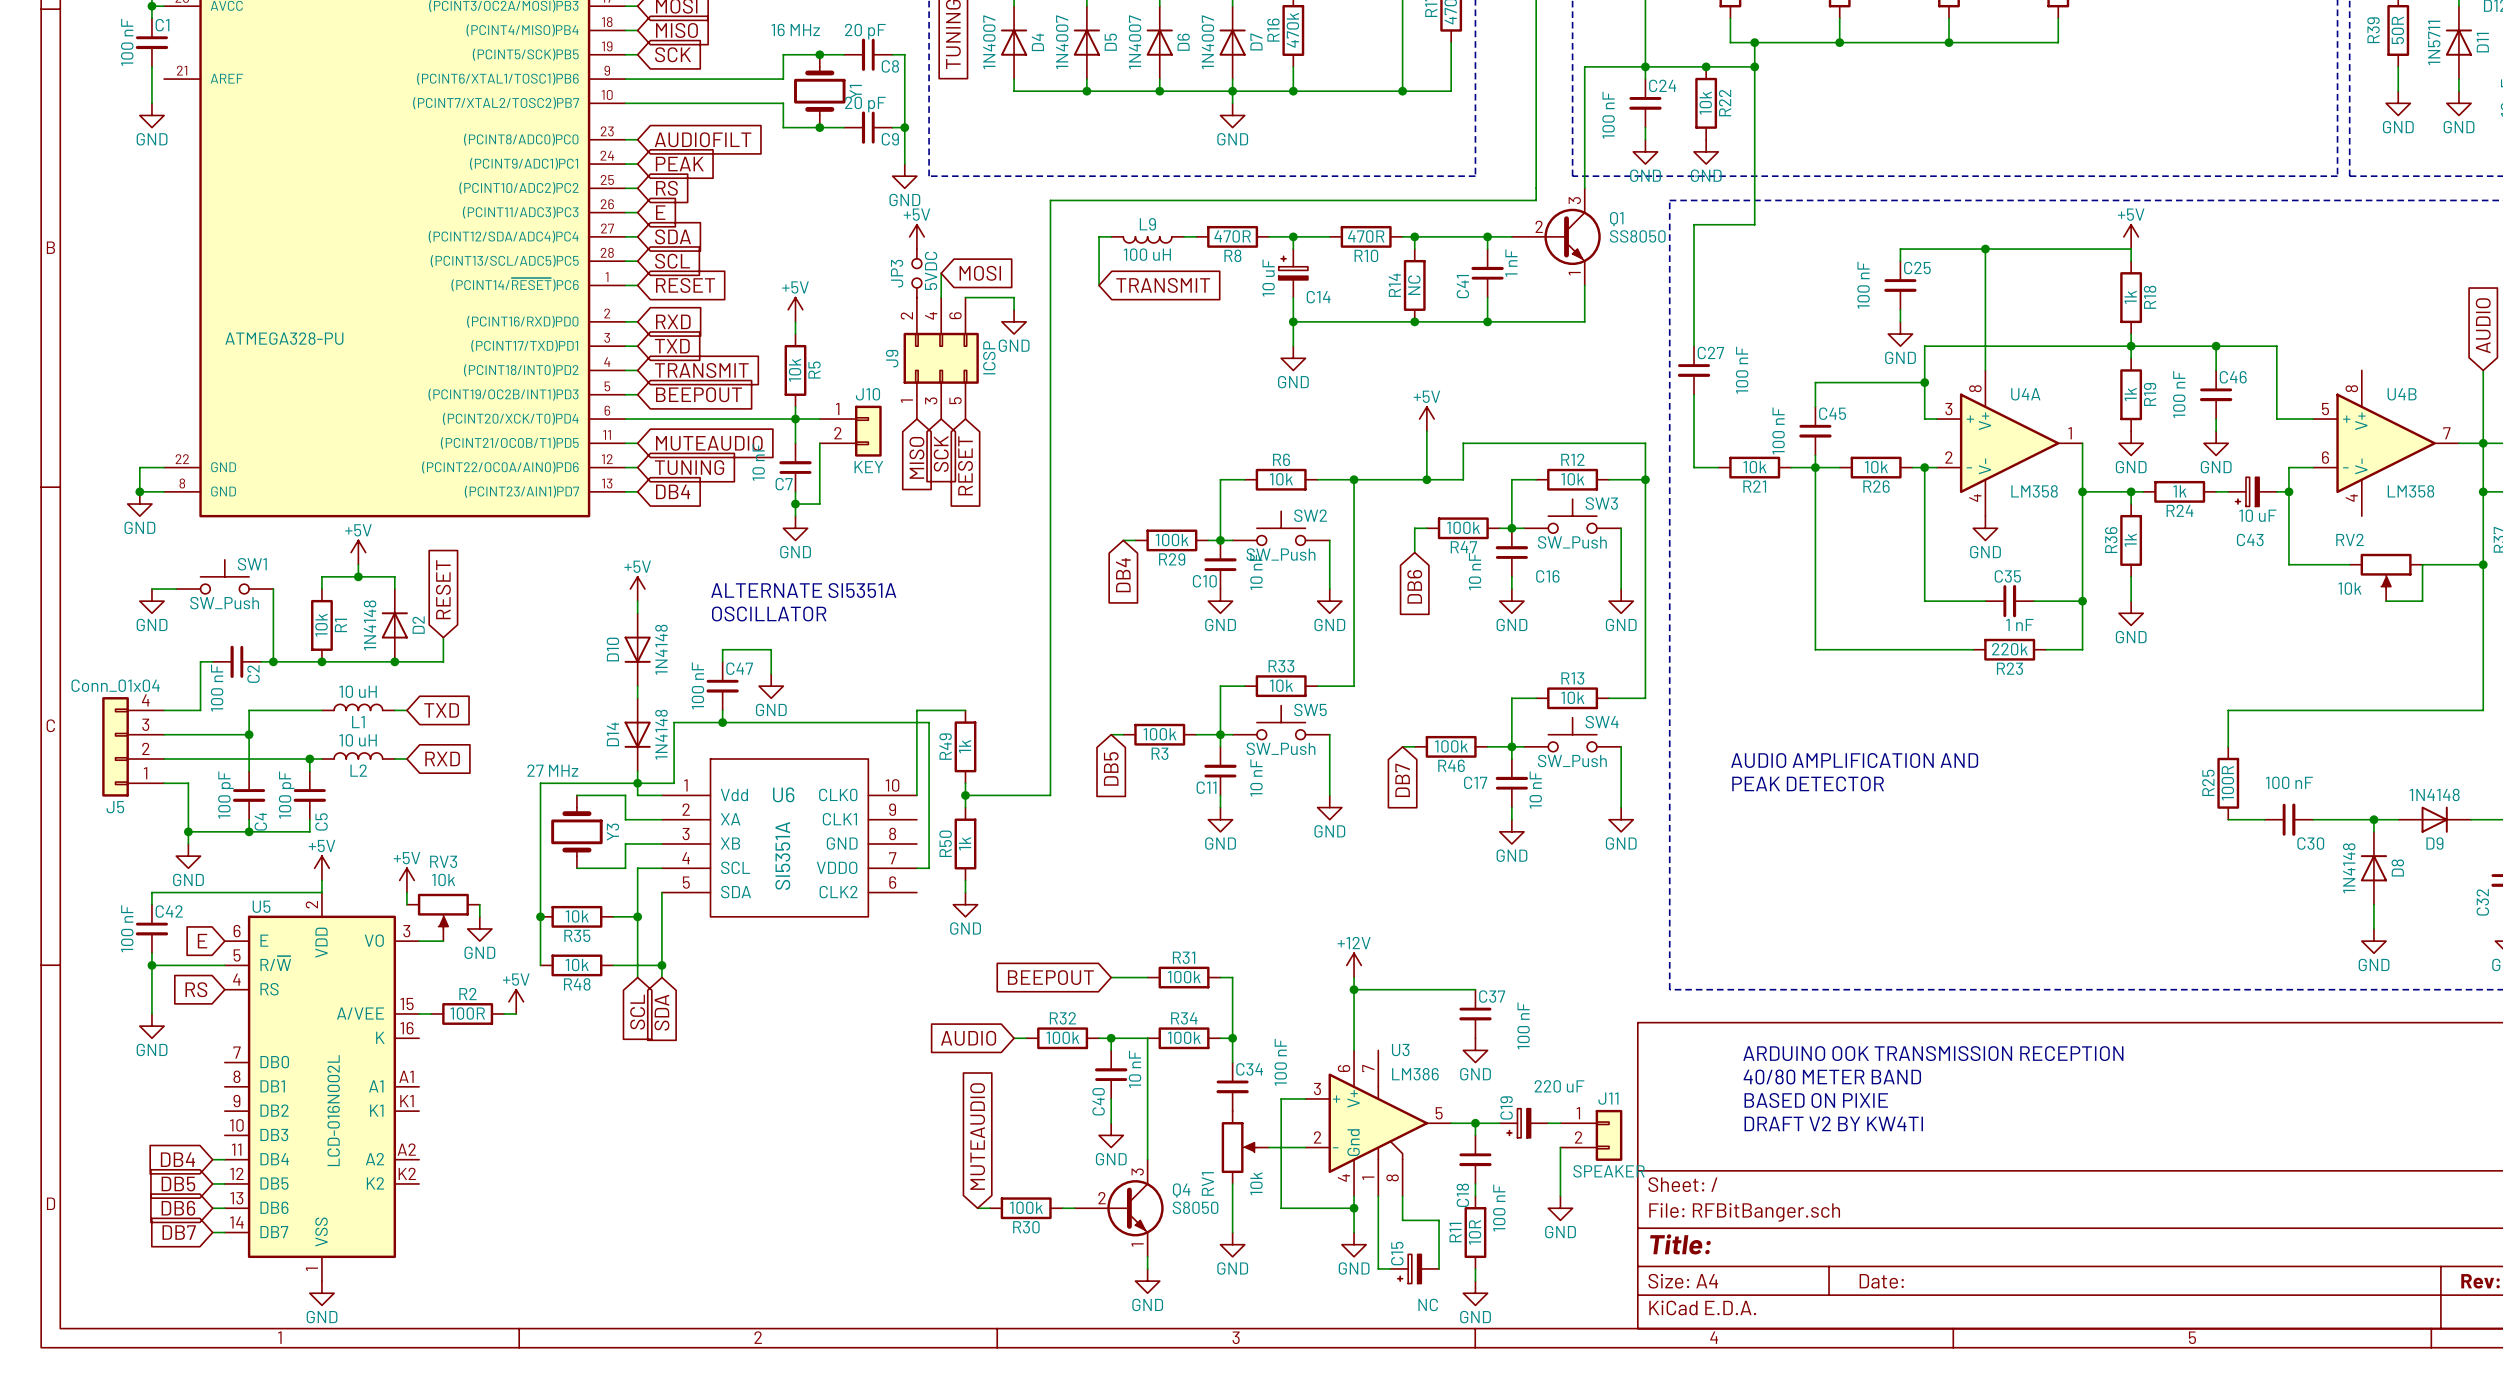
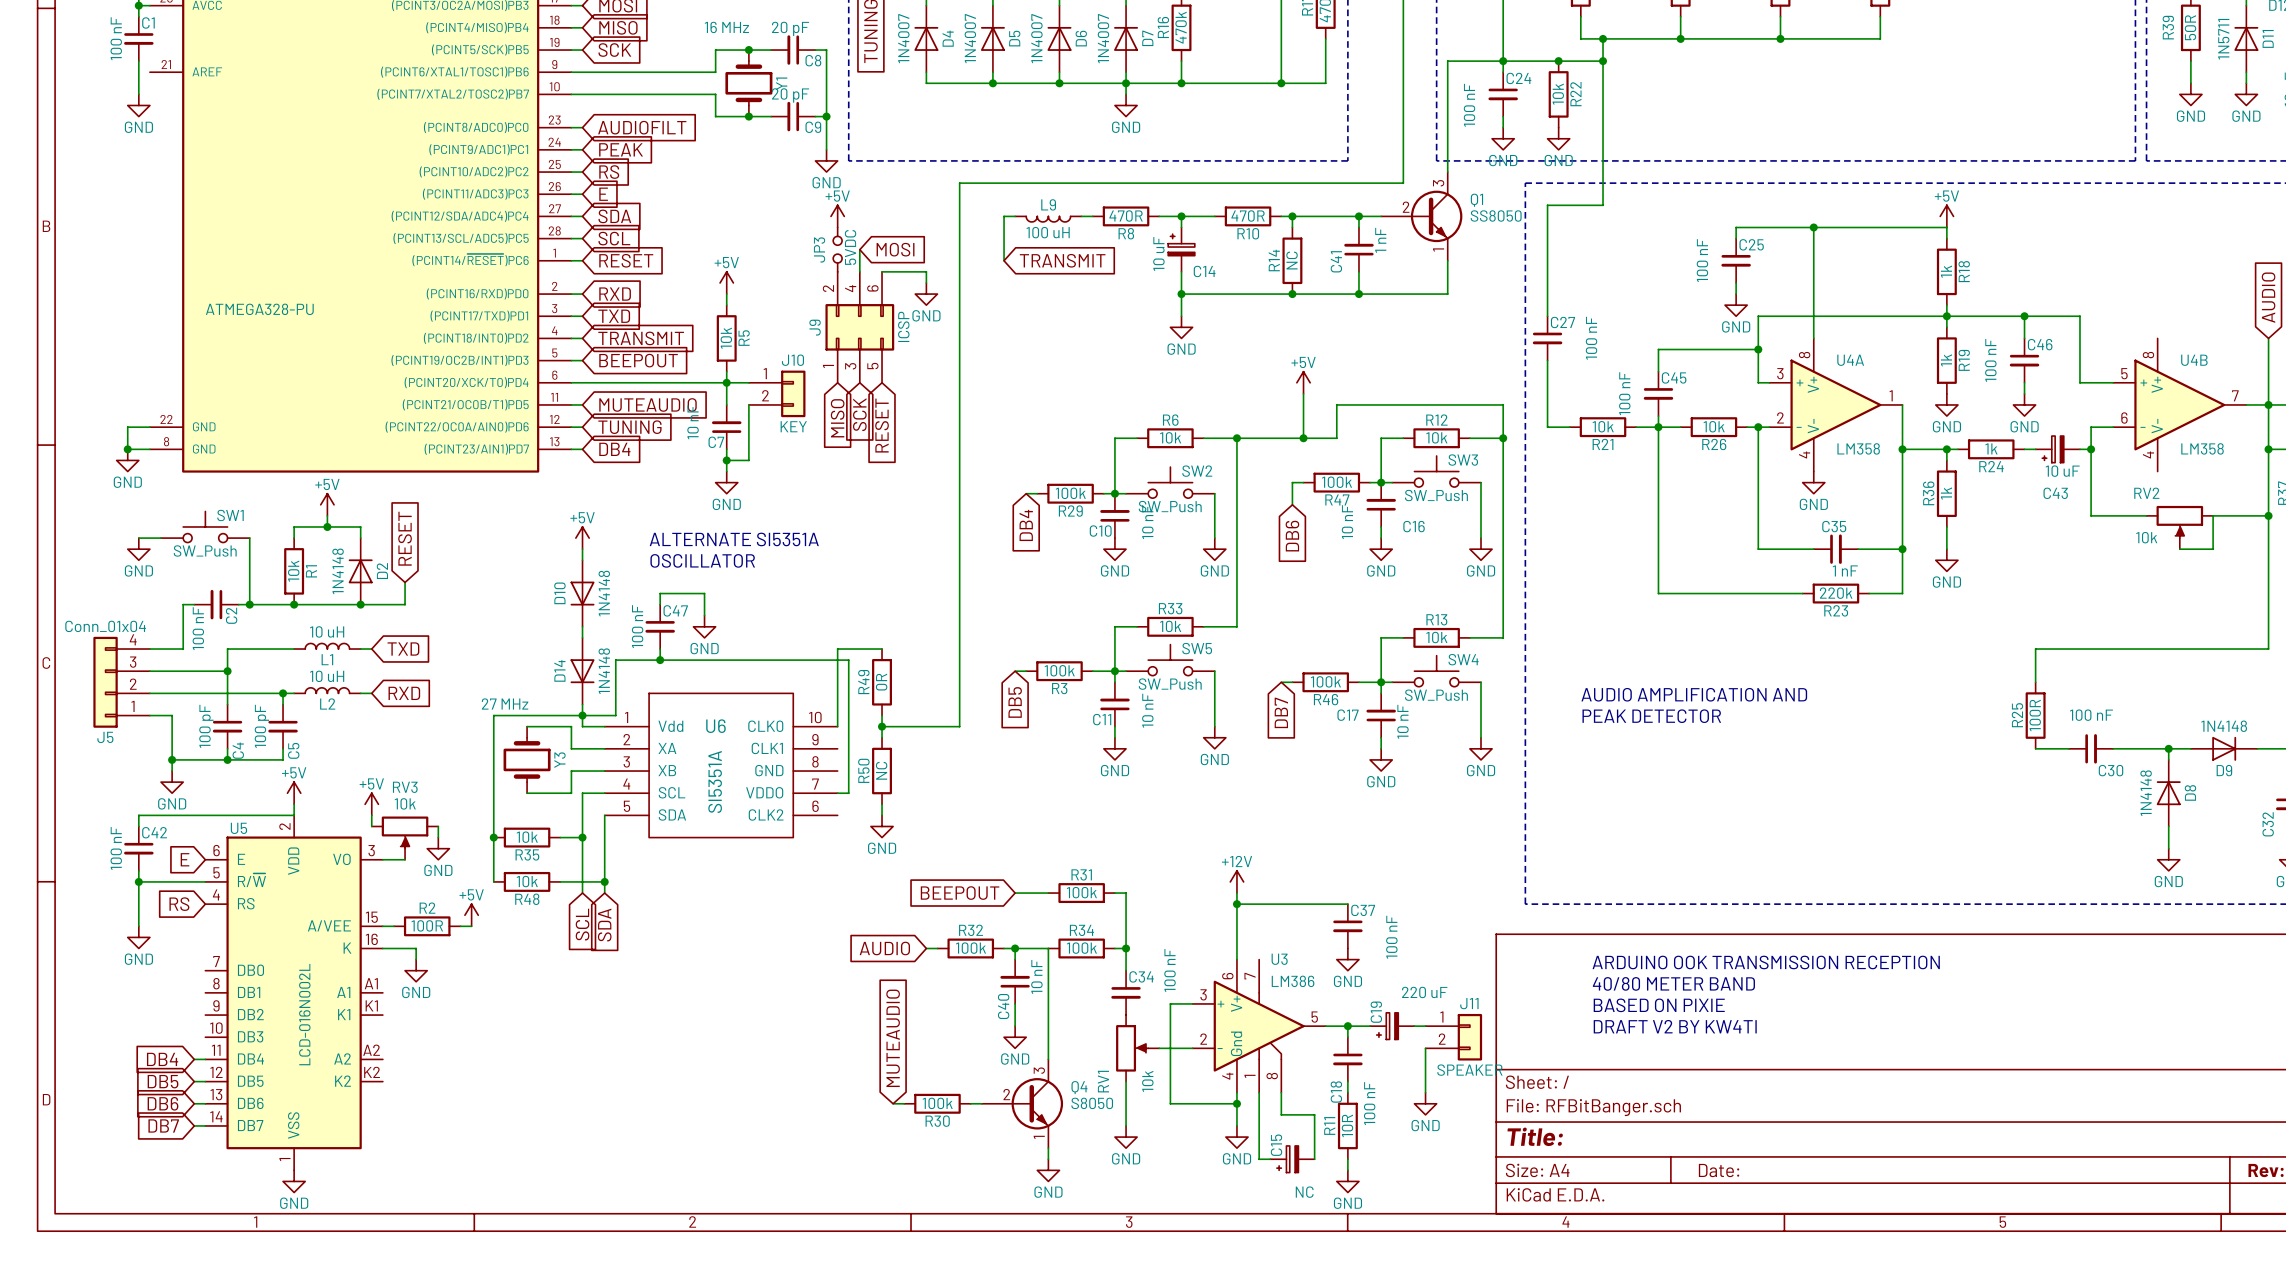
R49 value: 1k (965, 746) -> 0R (881, 682)
R50 value: 1k (965, 843) -> NC (881, 770)
wire: none -> (382, 948) (416, 948) (416, 959)
power symbol: none -> GND (416, 970)

